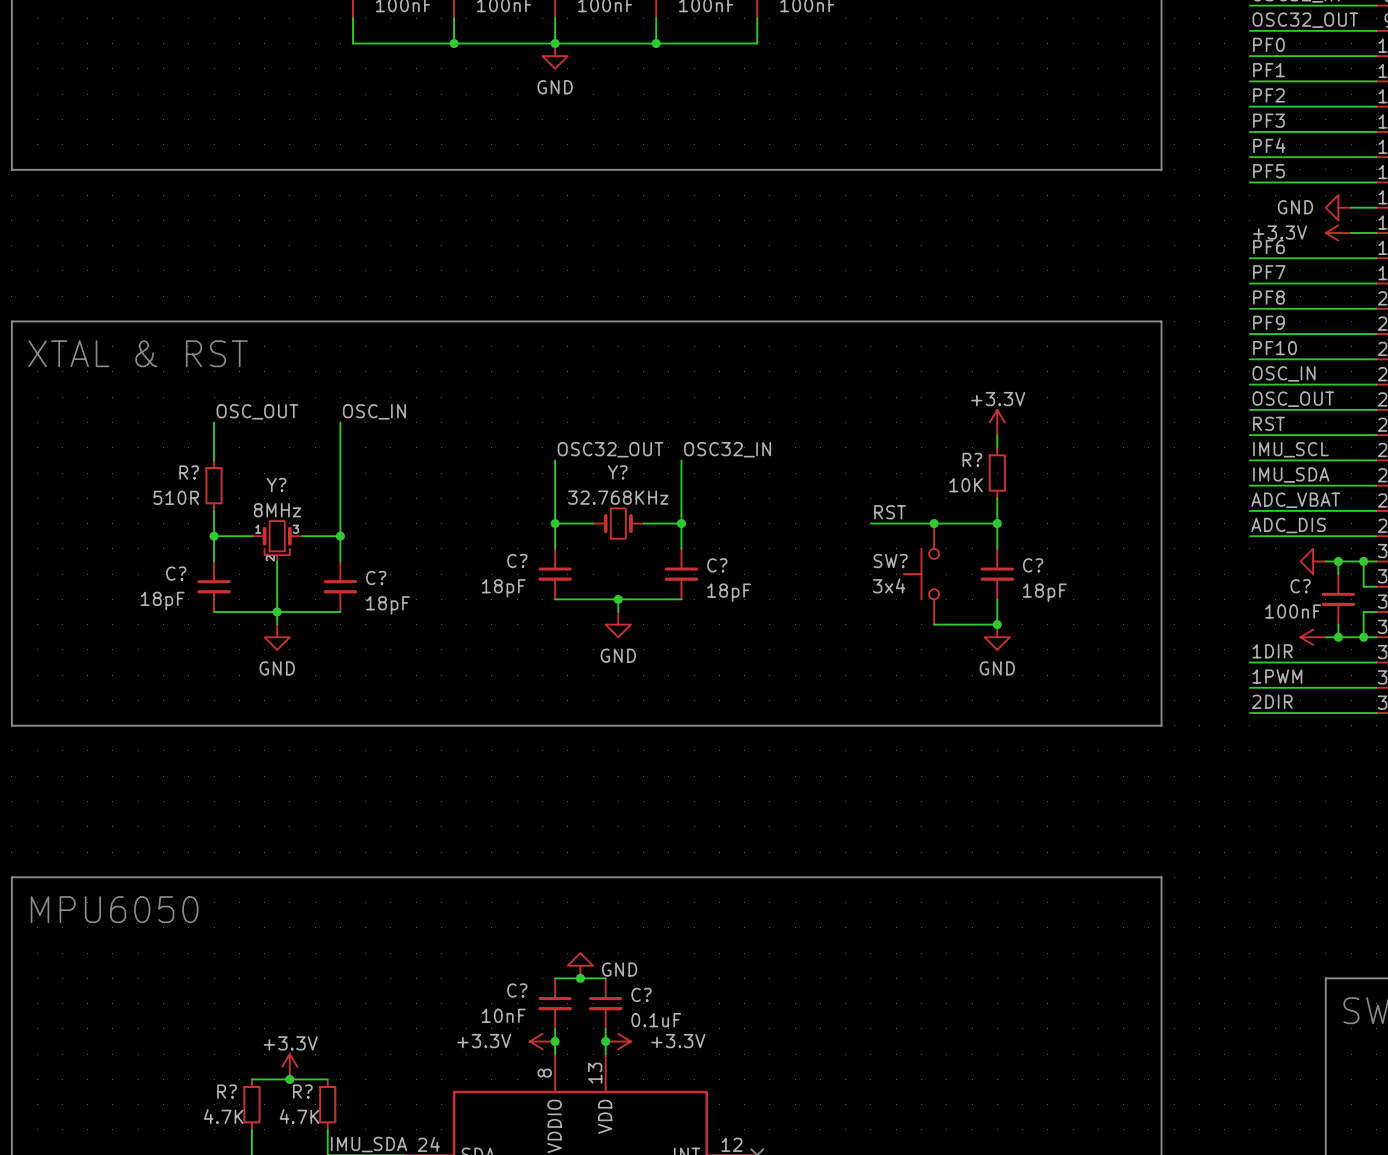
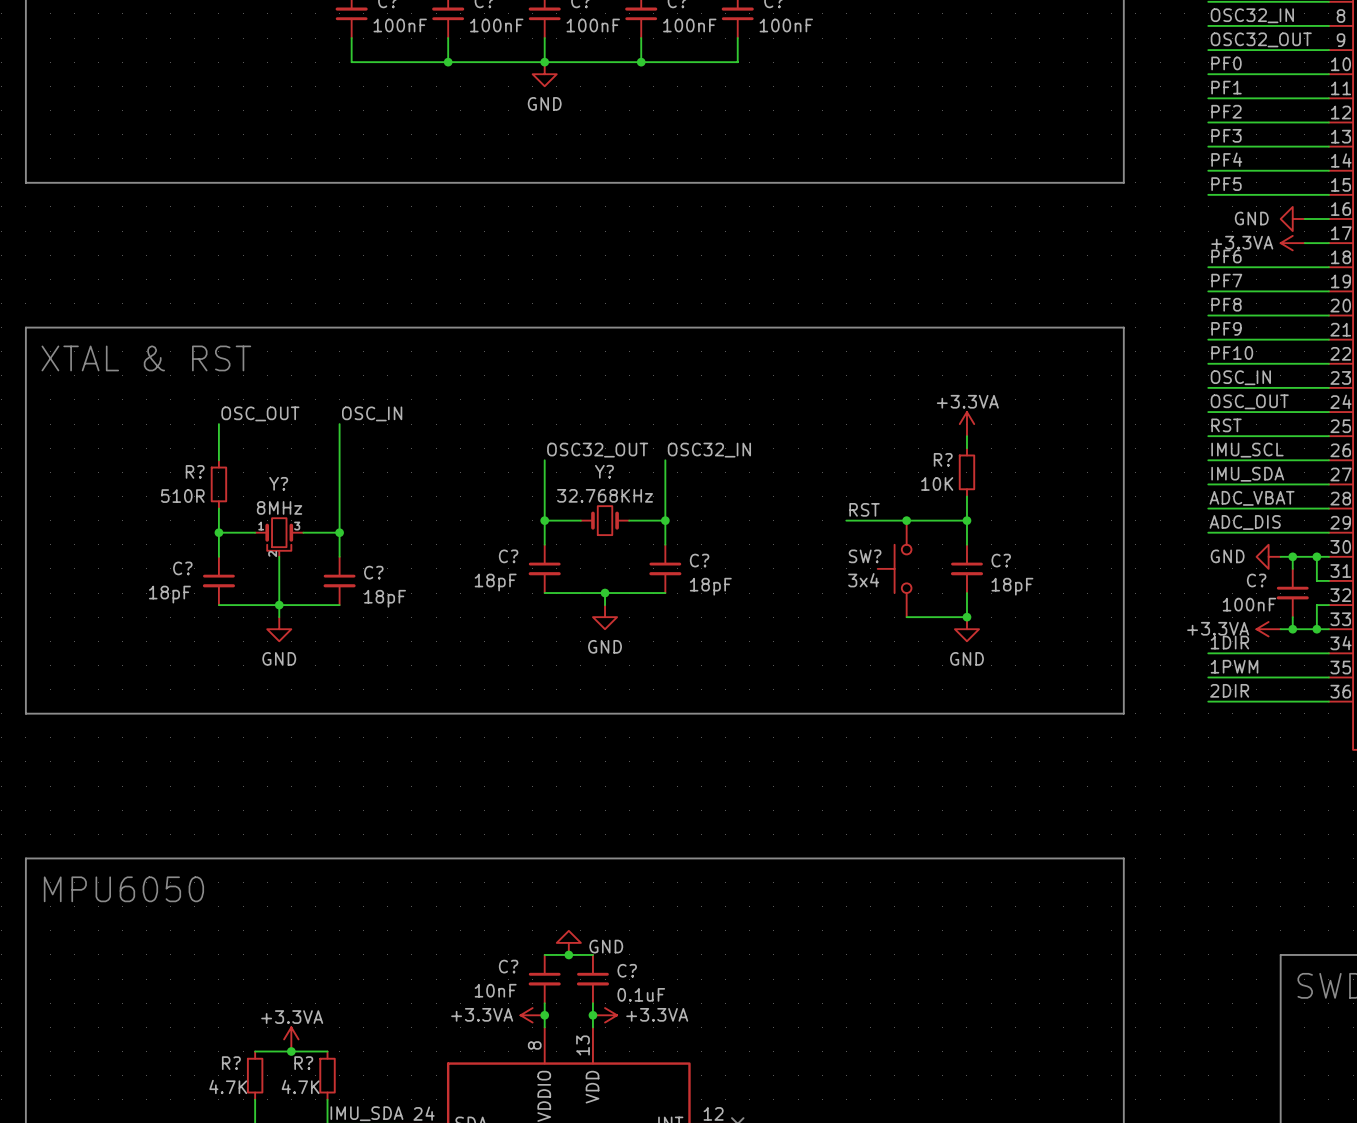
power symbol: +3.3V (1338, 233) -> +3.3VA (1292, 243)
power symbol: +3.3V (997, 422) -> +3.3VA (966, 424)
power symbol text: none -> GND (1227, 556)
power symbol text: none -> +3.3VA (1218, 628)
power symbol: +3.3V (542, 1041) -> +3.3VA (532, 1015)
power symbol: +3.3V (618, 1041) -> +3.3VA (605, 1015)
power symbol: +3.3V (289, 1066) -> +3.3VA (291, 1039)

